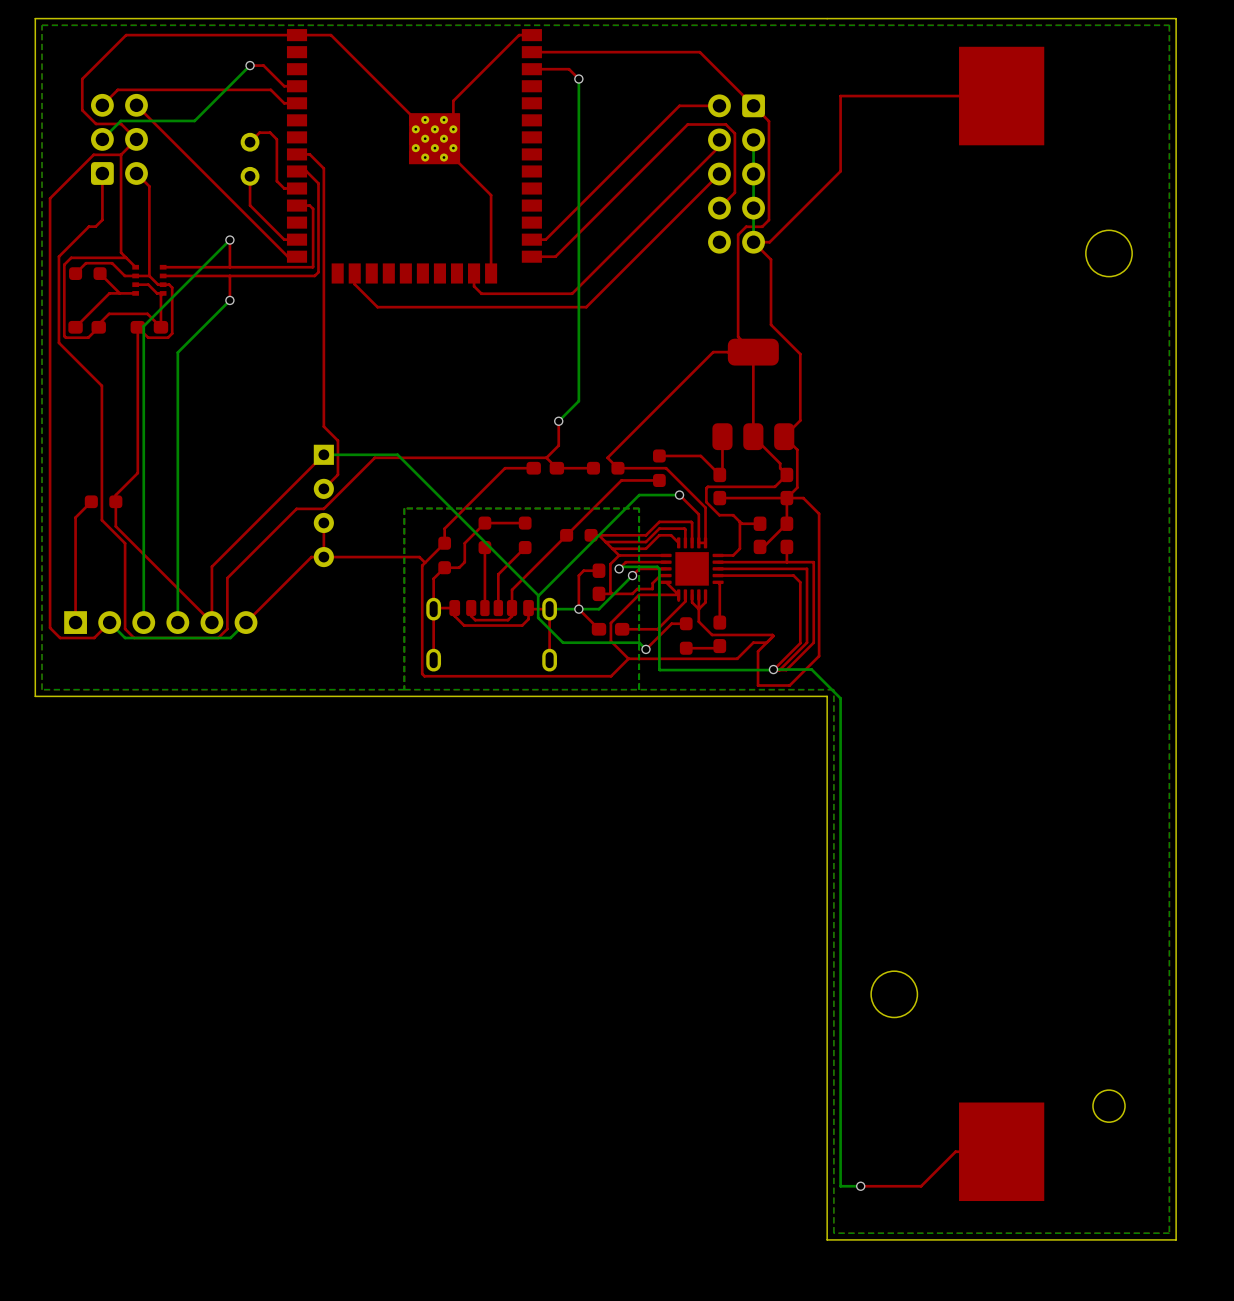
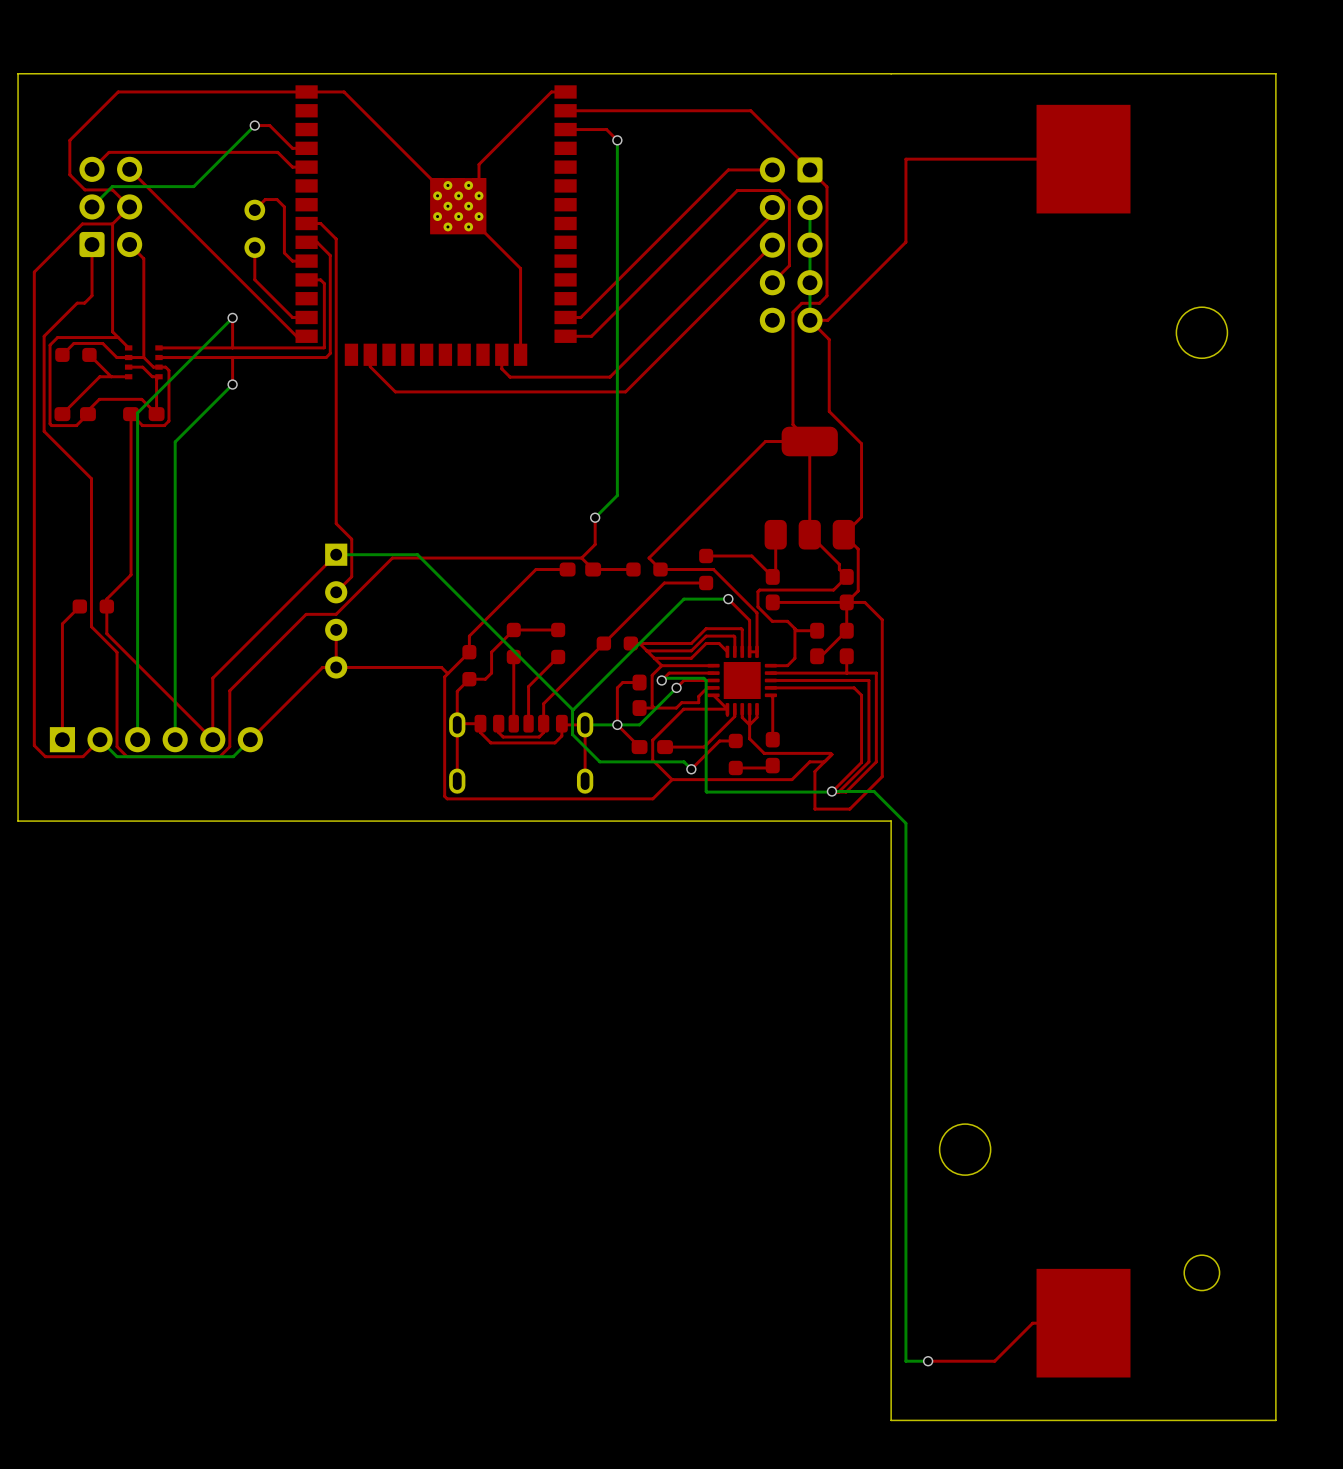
bottom zone outline: (1169, 25) (42, 25) (42, 689) (833, 689) (833, 1233) (1169, 1233) (1169, 25) -> none
bottom zone outline: (639, 689) (639, 508) (404, 508) (404, 689) -> none

